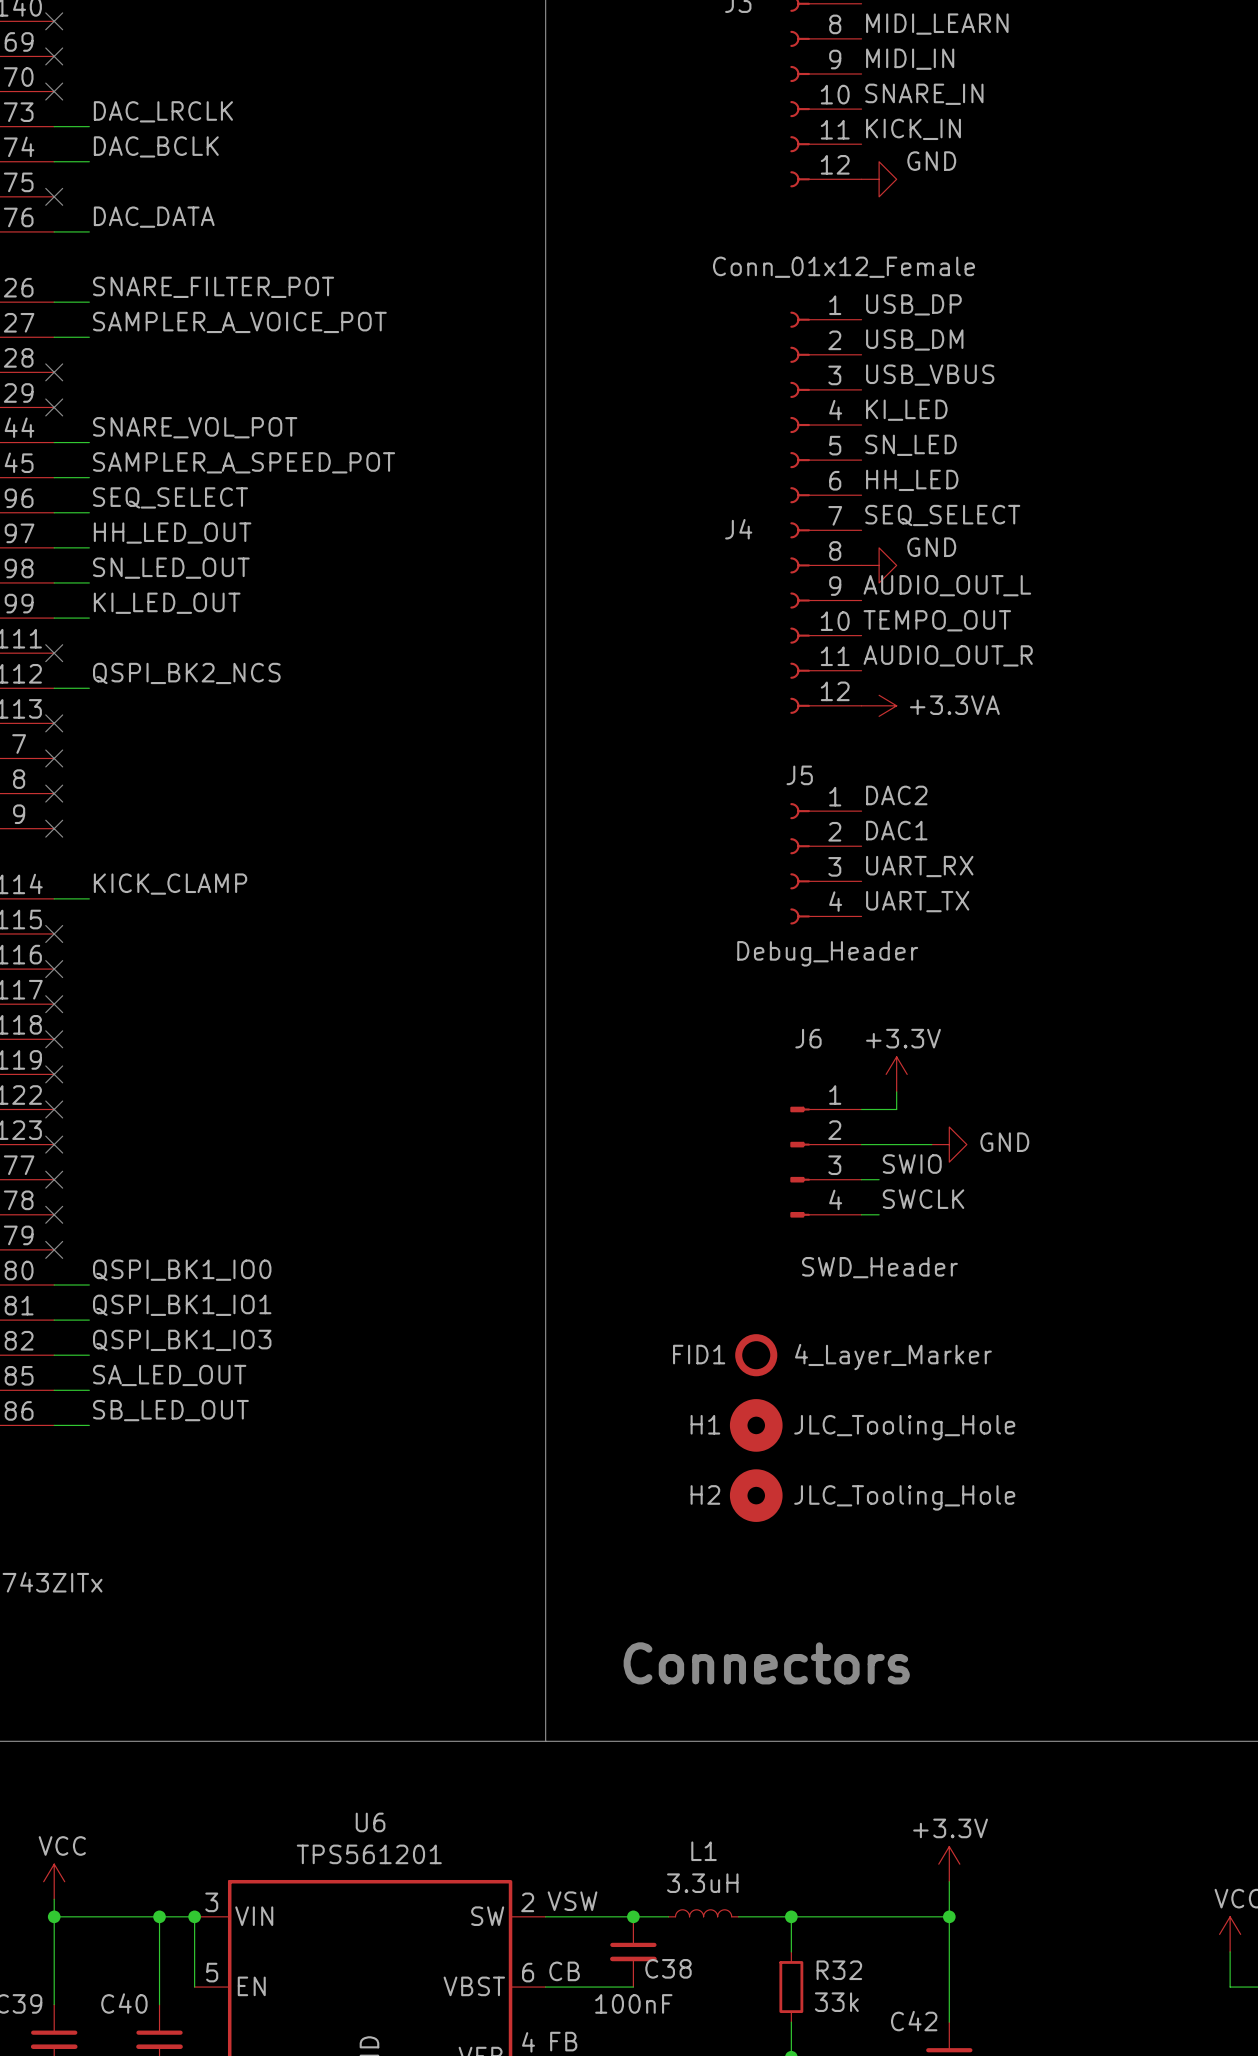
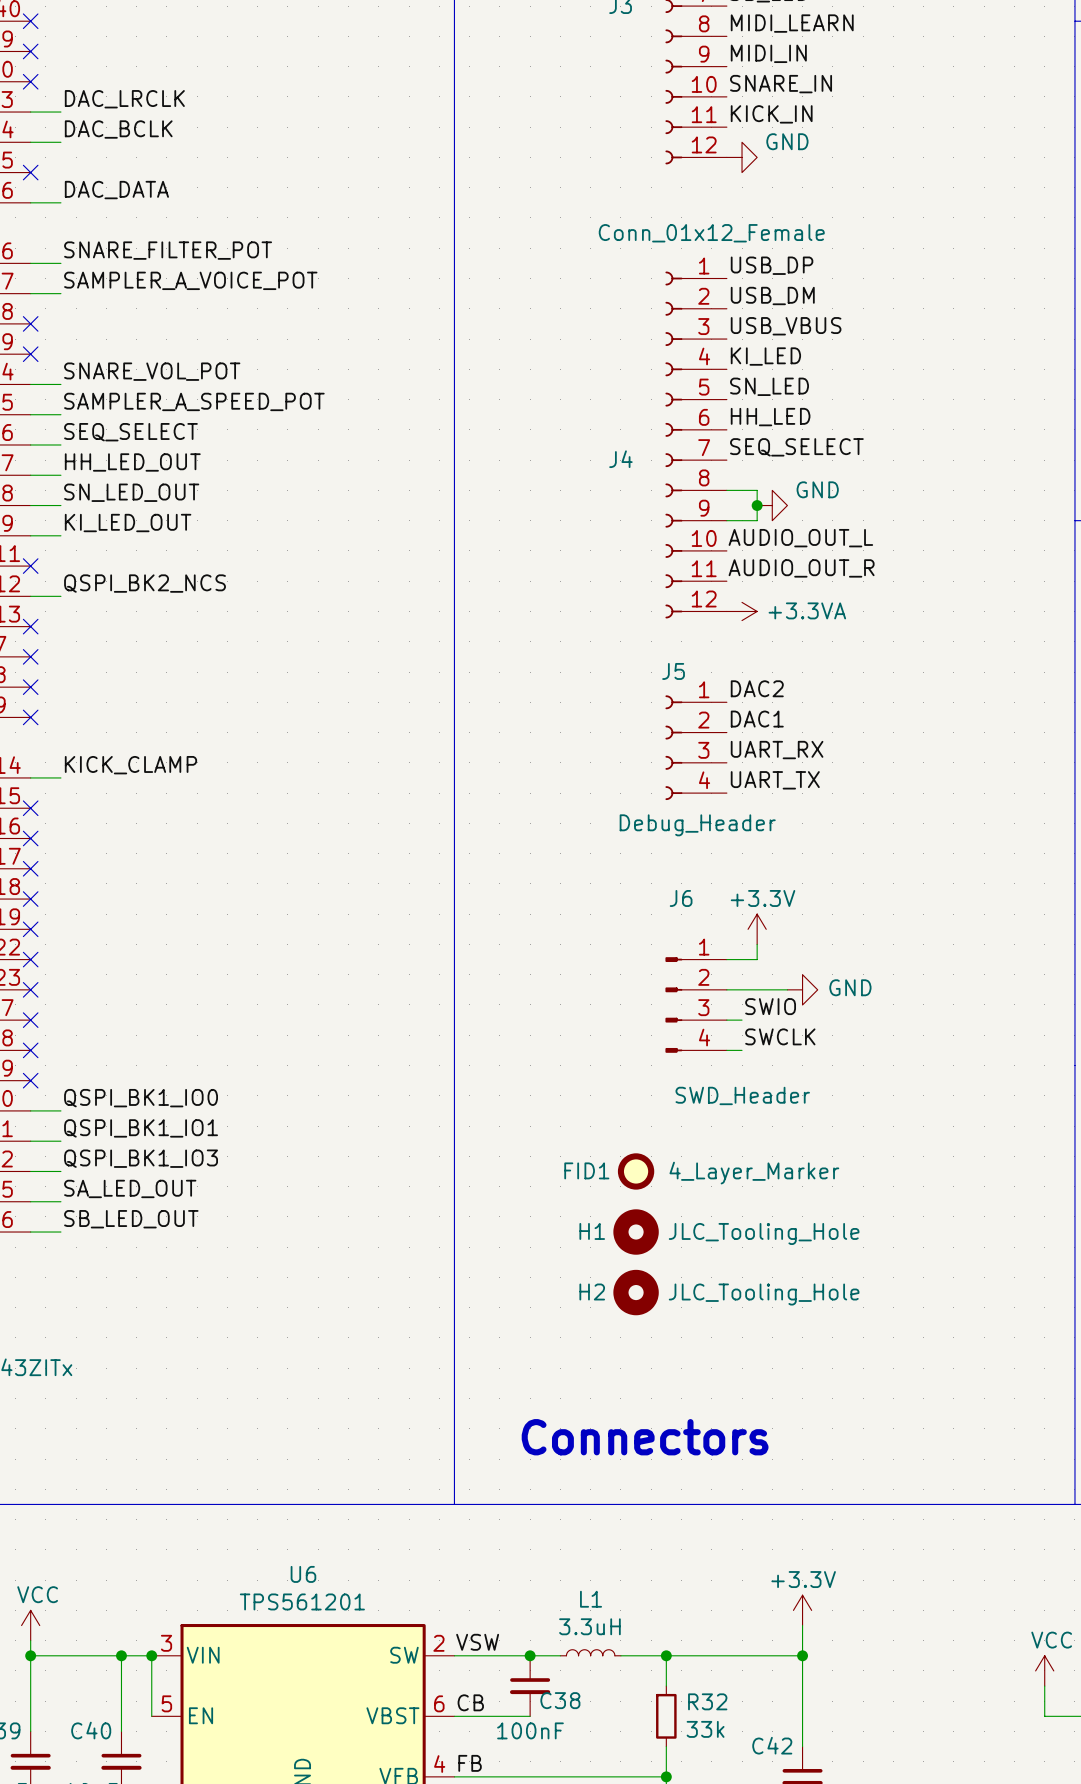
wire: none -> (726, 490) (757, 490) (757, 520) (726, 520)
power symbol position: GND (879, 565) -> GND (772, 505)
junction: none -> (757, 505)
label: AUDIO_OUT_L (947, 585) -> none
label: TEMPO_OUT (937, 620) -> AUDIO_OUT_L (800, 538)

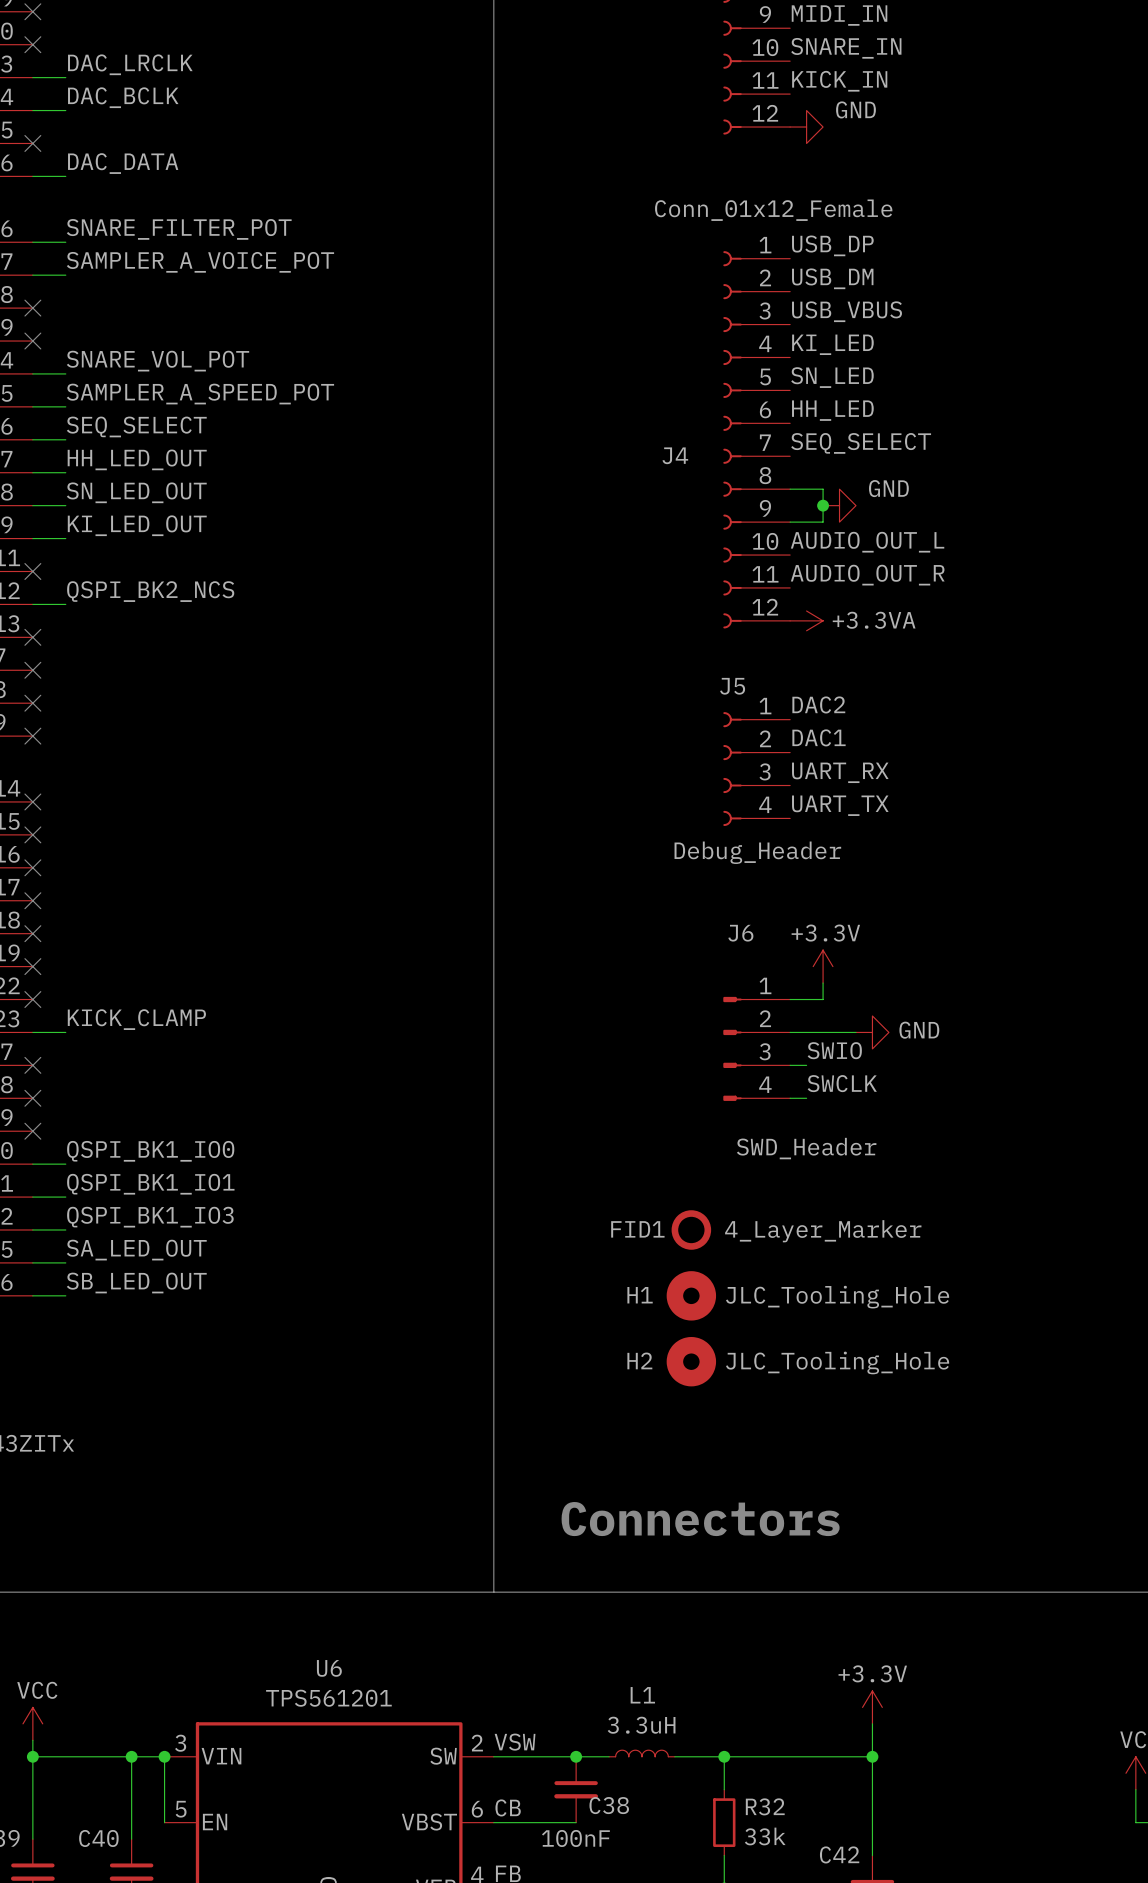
label position: KICK_CLAMP (130, 765) -> KICK_CLAMP (136, 1019)
wire: (30, 777) (60, 777) -> (32, 1032) (65, 1032)
no-connect mark: none -> (32, 801)
no-connect mark: (30, 989) -> none

